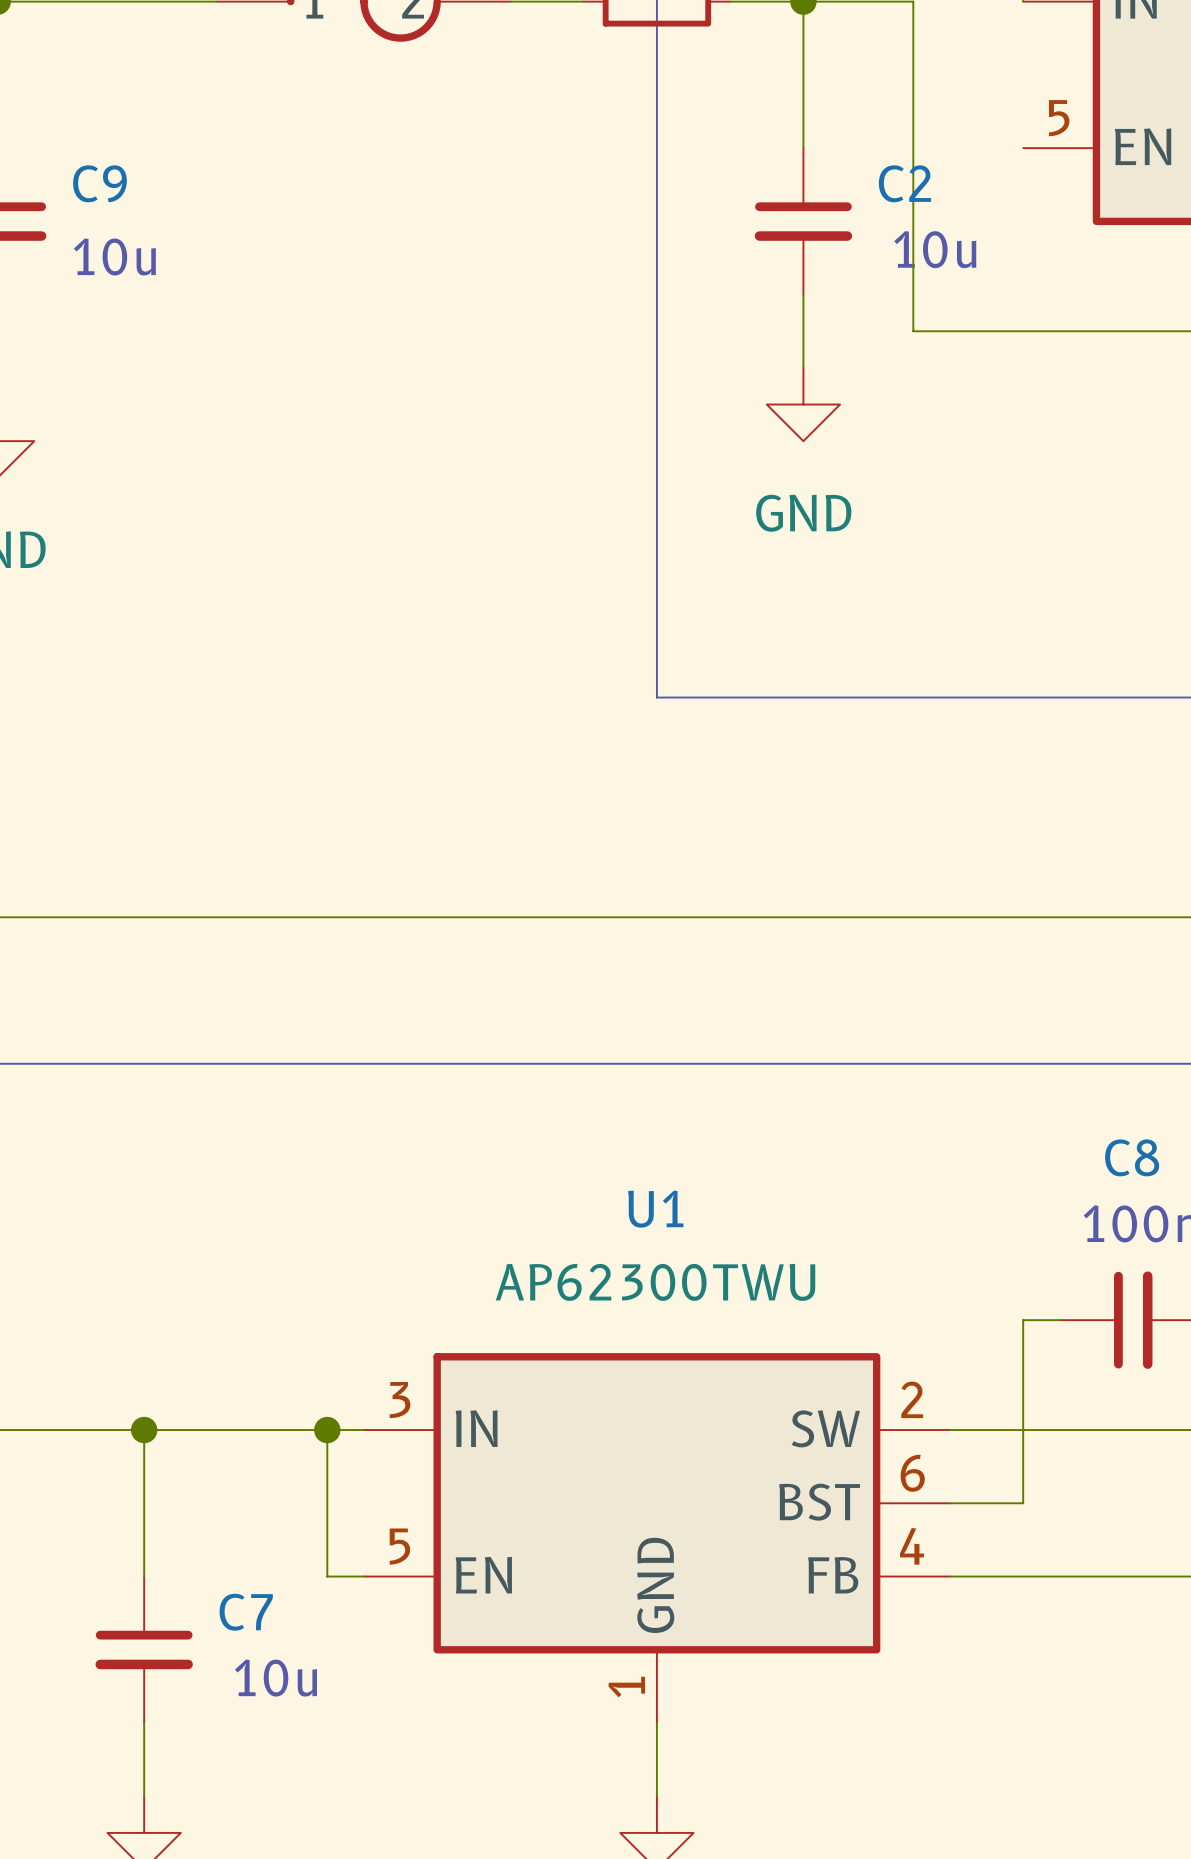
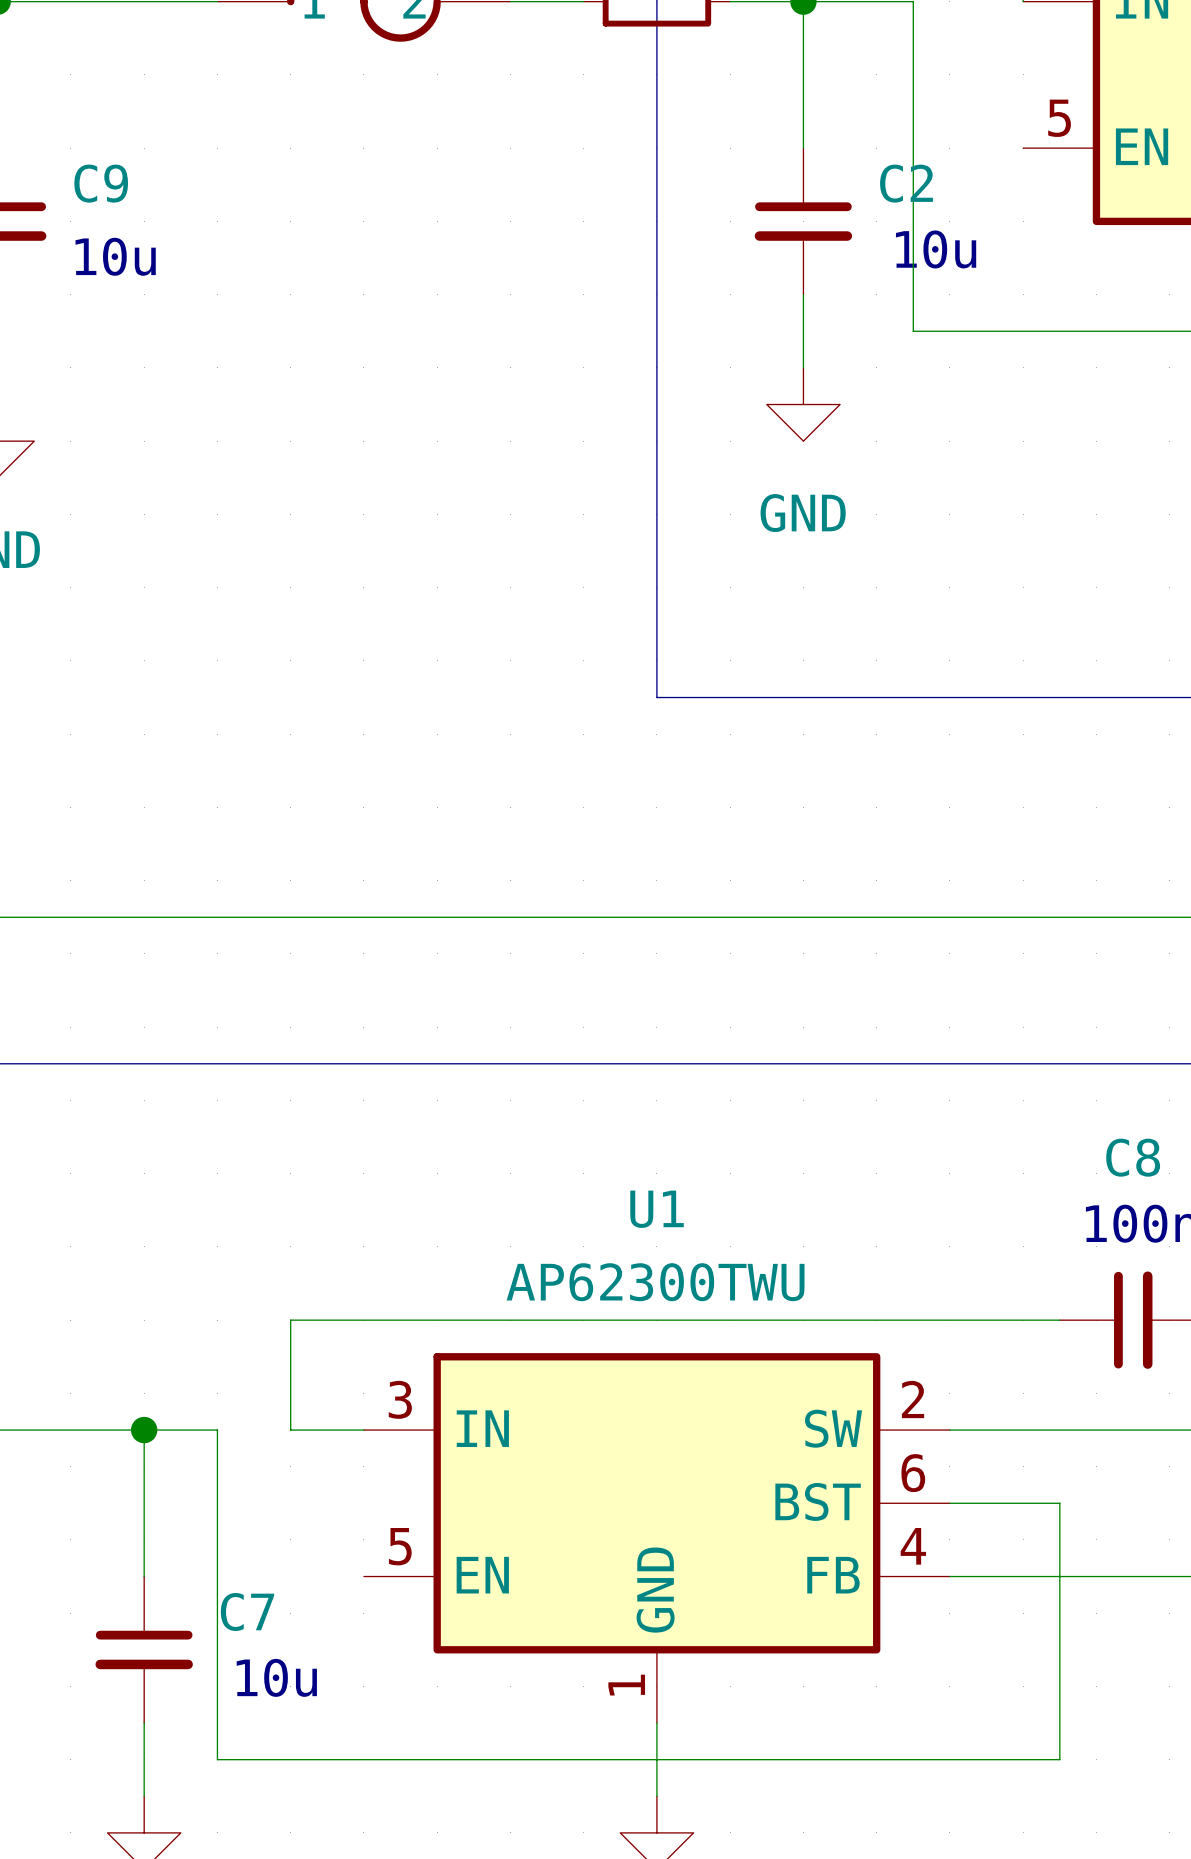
wire: (1023, 1320) (1023, 1503) -> (1023, 1320) (290, 1320) (290, 1430)
wire: (217, 1430) (290, 1430) -> (217, 1430) (217, 1759) (1059, 1759) (1059, 1503) (1023, 1503)
wire: (327, 1430) (327, 1576) (363, 1576) -> none
junction: (327, 1430) -> none

